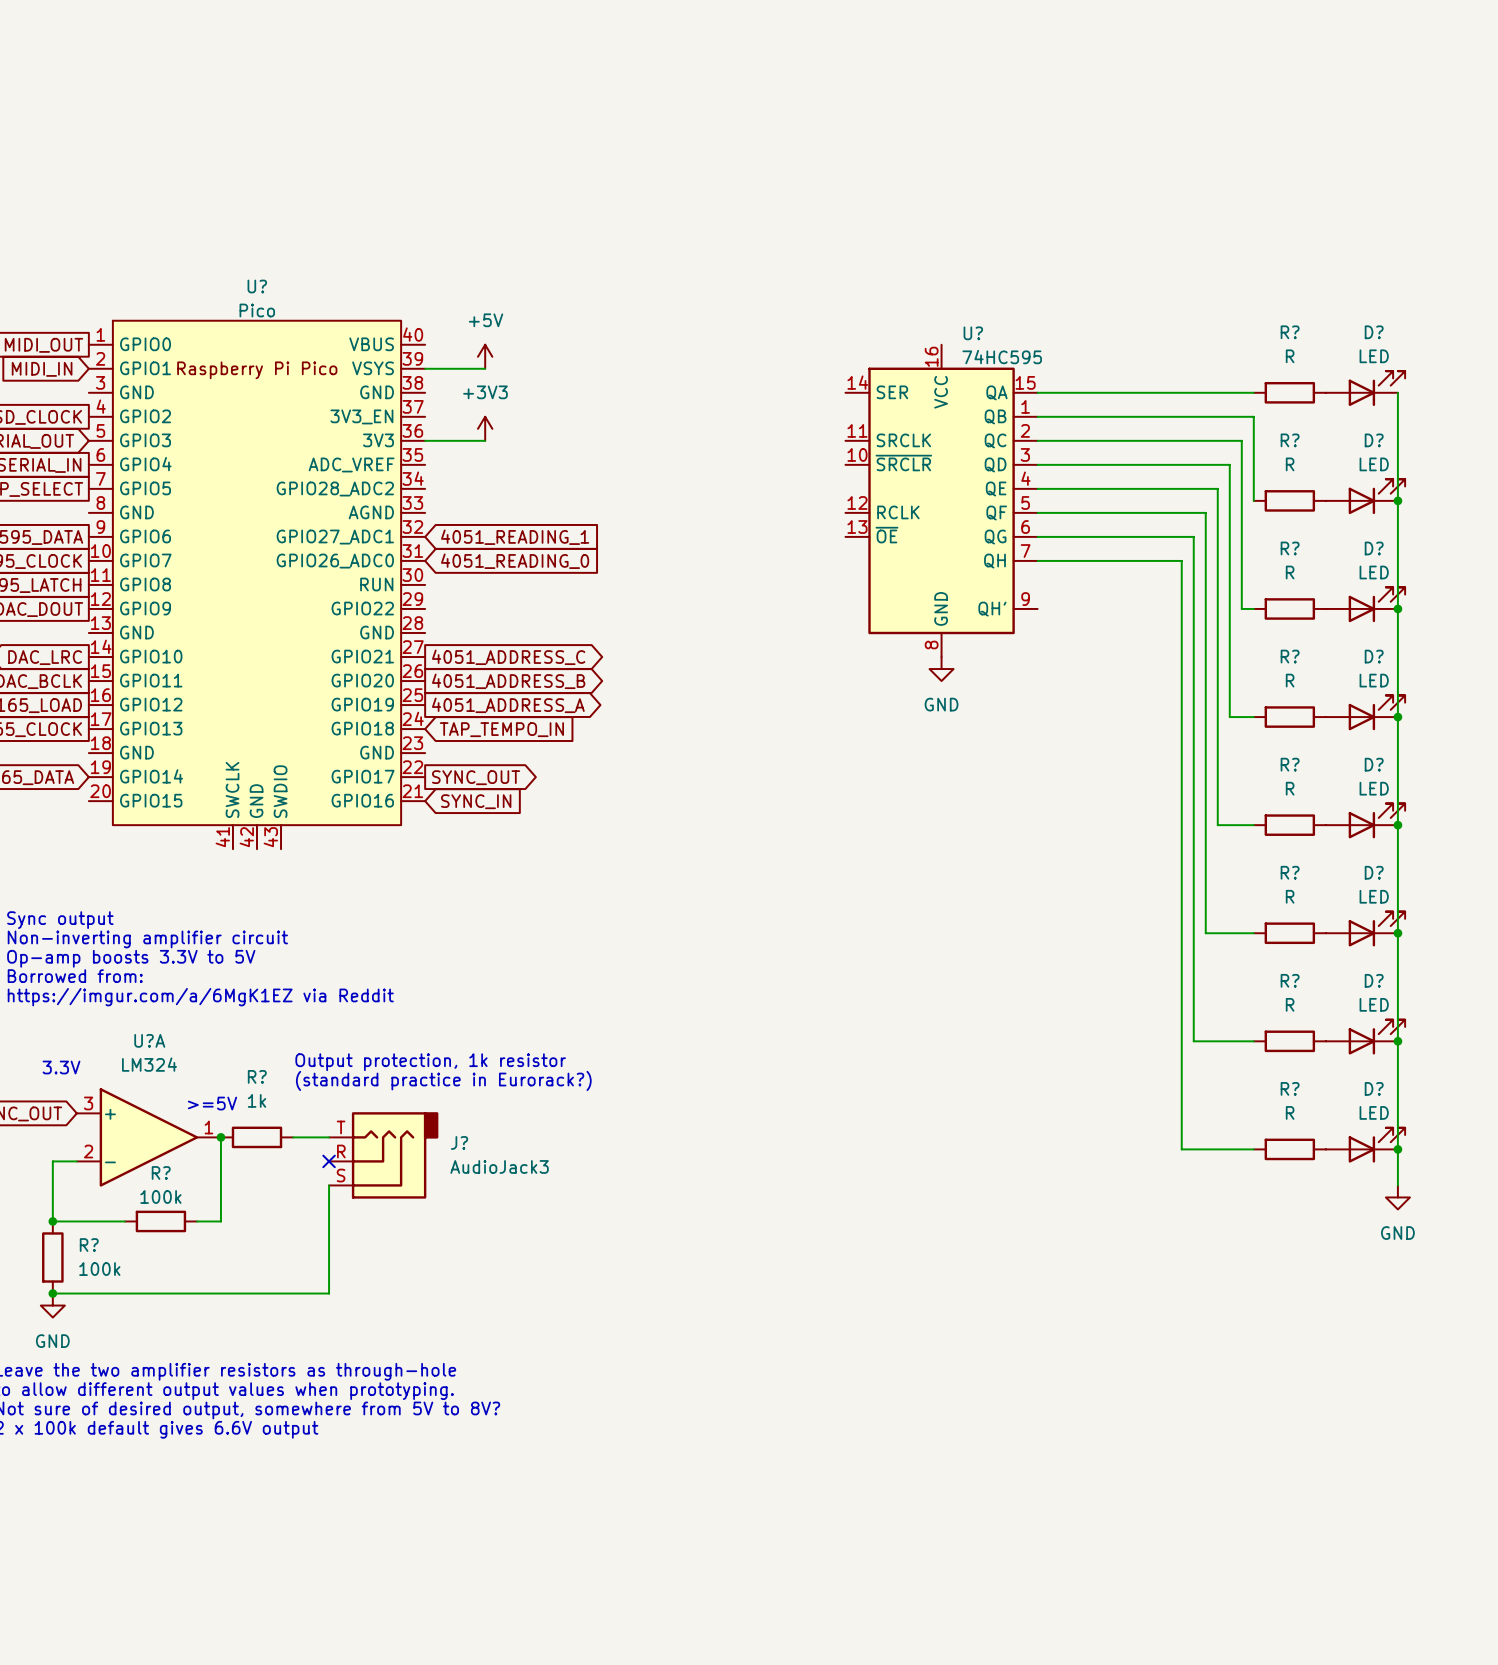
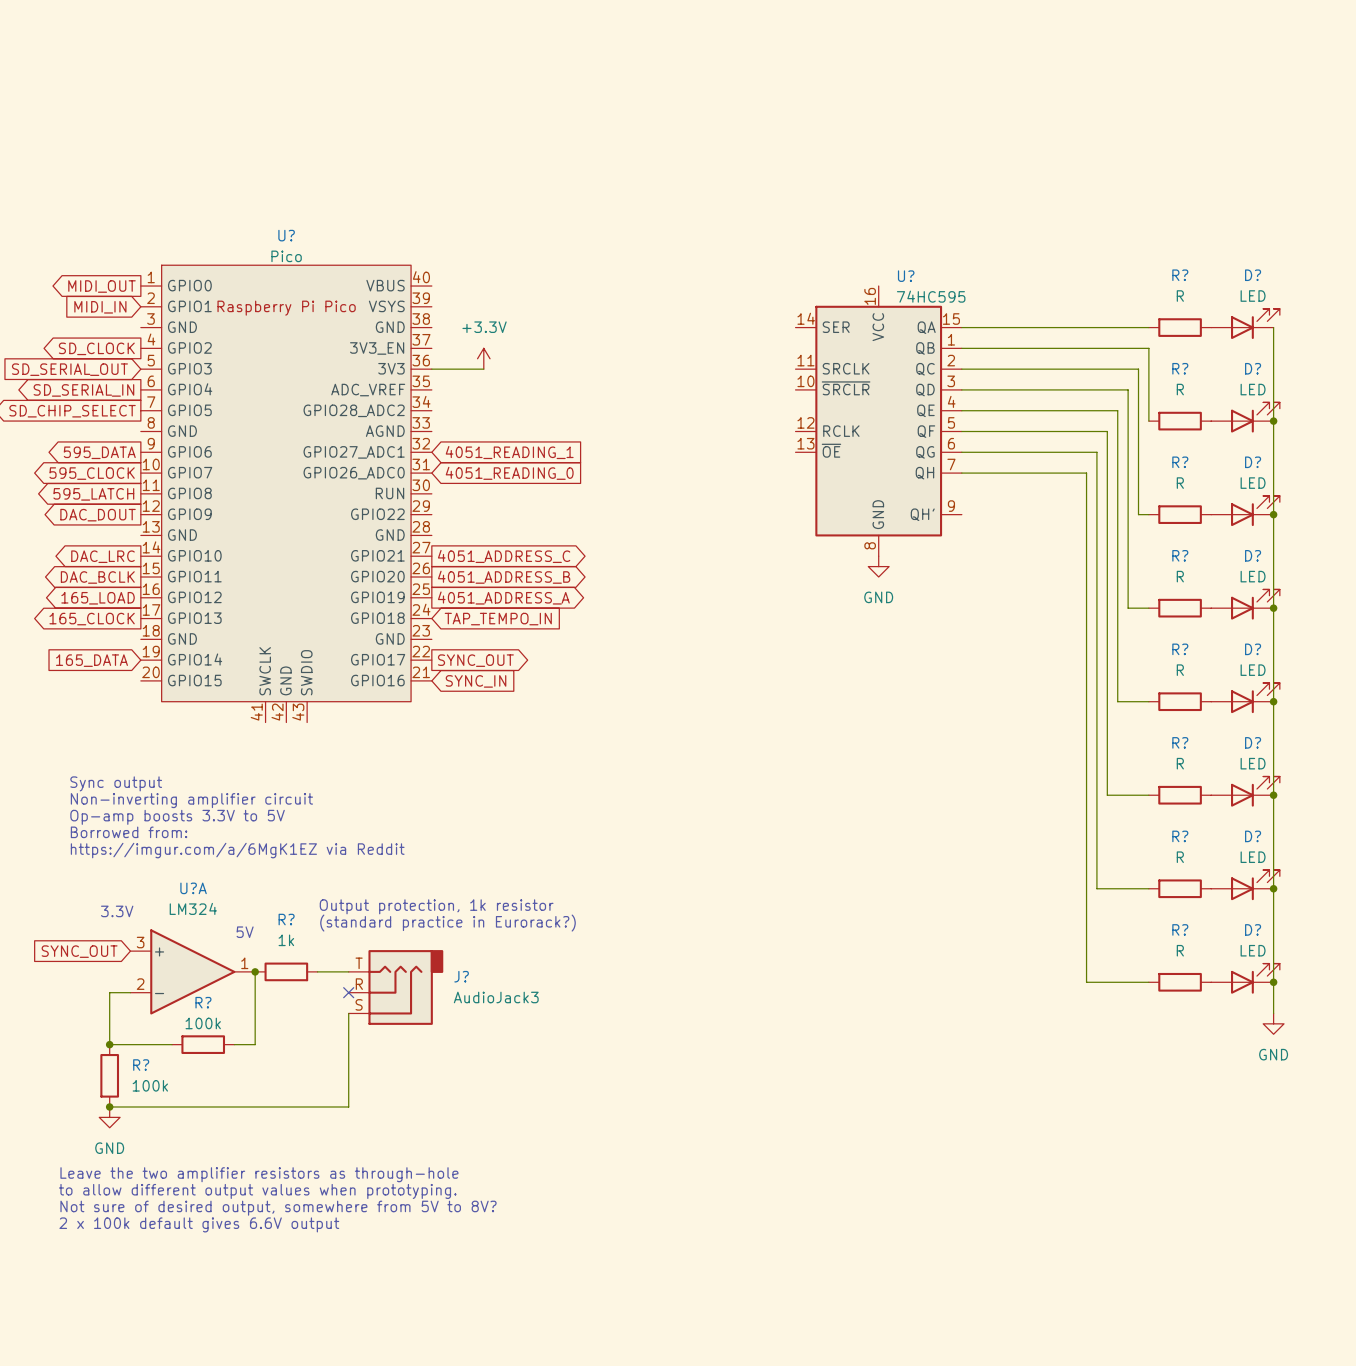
power symbol: +5V (485, 356) -> none
wire: (425, 368) (485, 368) -> none
power symbol: +3V3 (485, 428) -> +3.3V (483, 358)
text: >=5V (212, 1103) -> 5V (245, 932)

